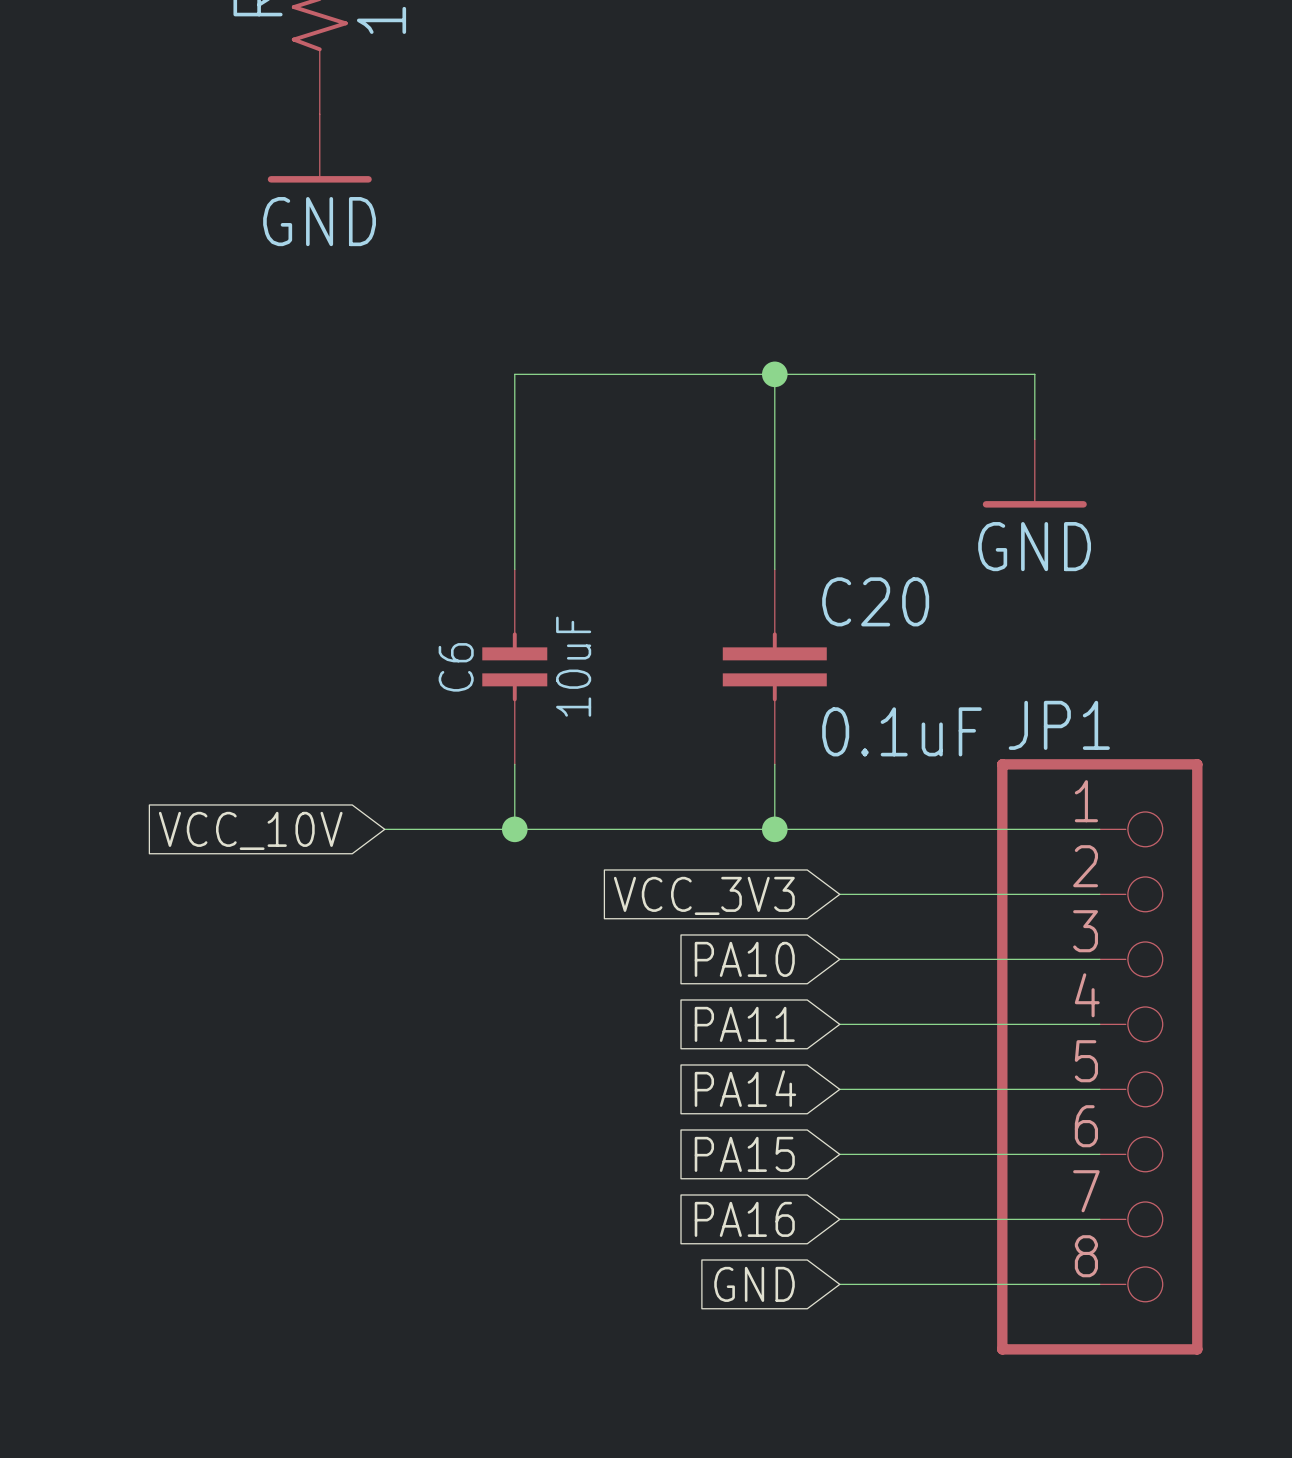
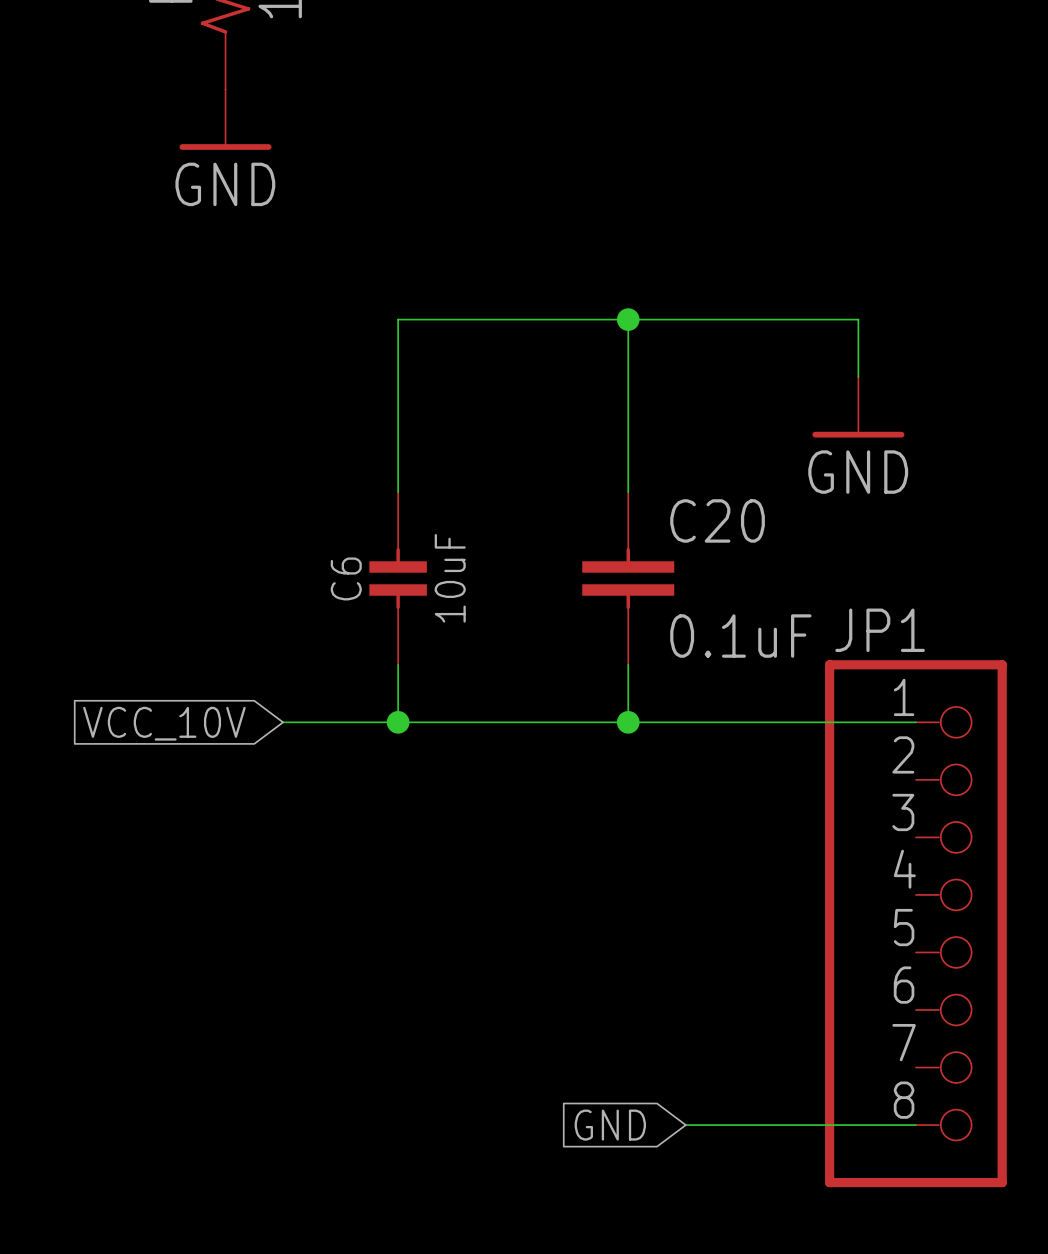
wire: (839, 894) (1099, 894) -> none
global label: VCC_3V3 (704, 895) -> none
global label: PA10 (744, 959) -> none
wire: (839, 959) (1099, 959) -> none
global label: PA11 (744, 1024) -> none
wire: (839, 1024) (1099, 1024) -> none
global label: PA14 (745, 1088) -> none
wire: (839, 1089) (1099, 1089) -> none
global label: PA15 (744, 1154) -> none
wire: (839, 1154) (1099, 1154) -> none
global label: PA16 (744, 1219) -> none
wire: (839, 1219) (1099, 1219) -> none

